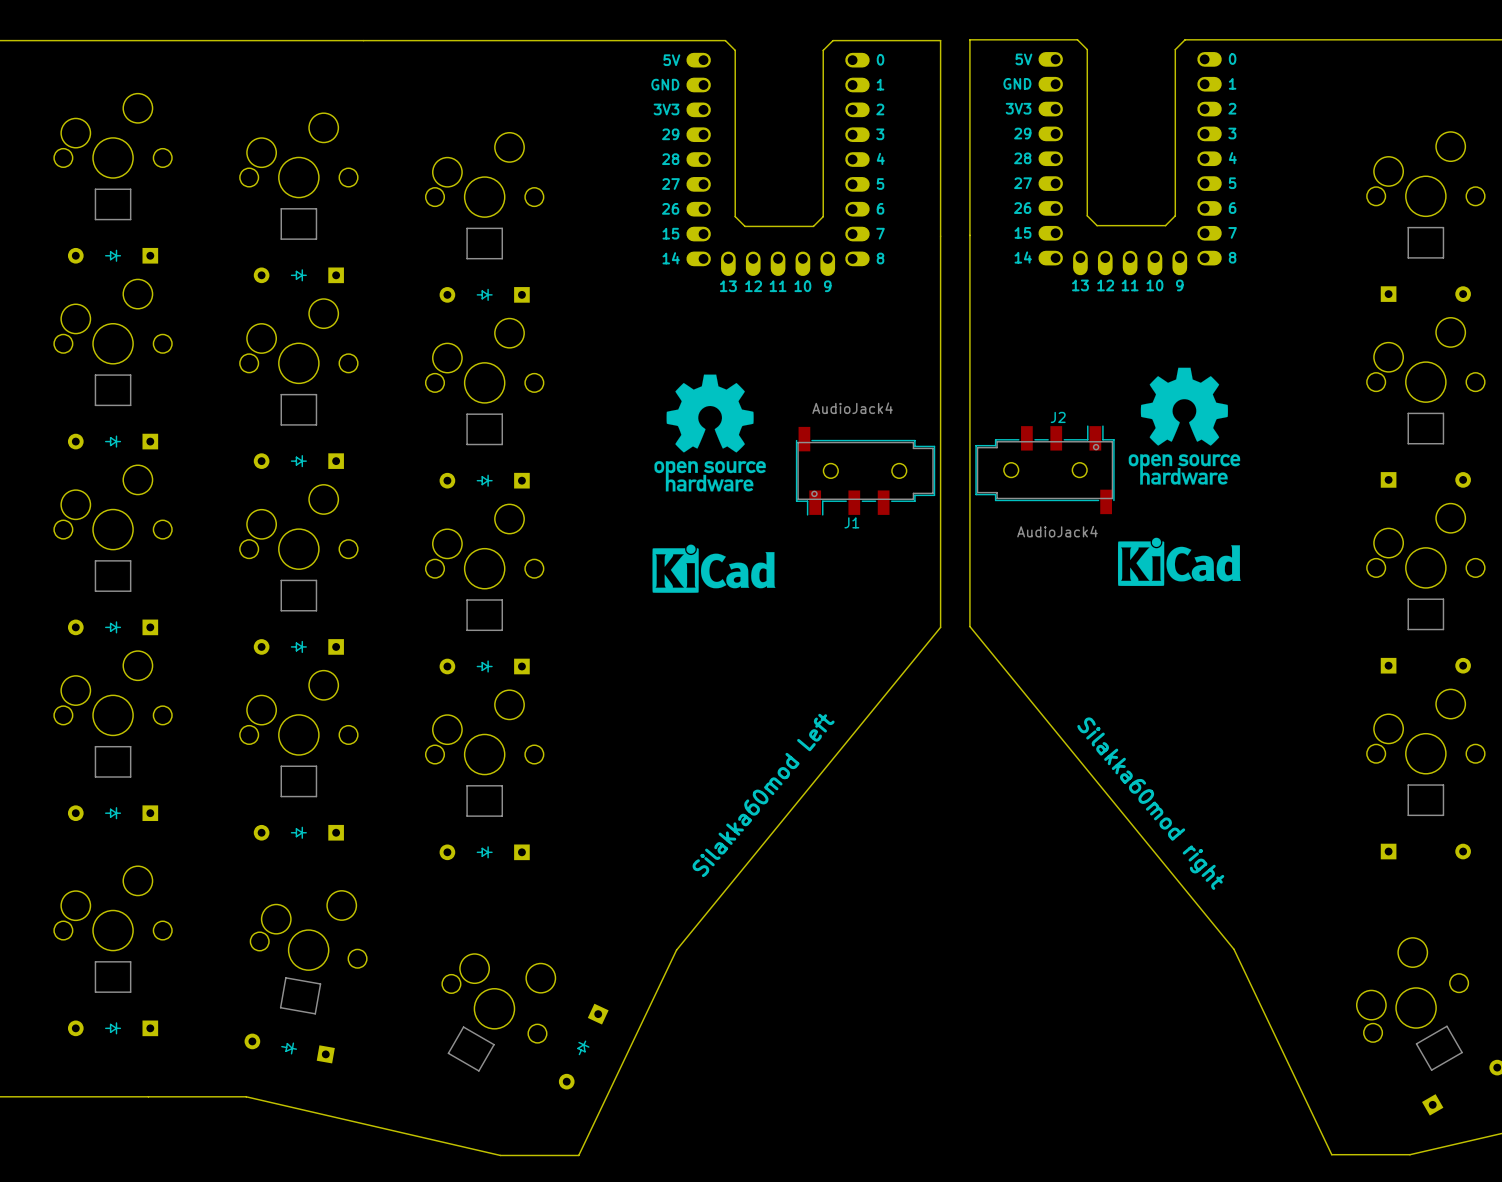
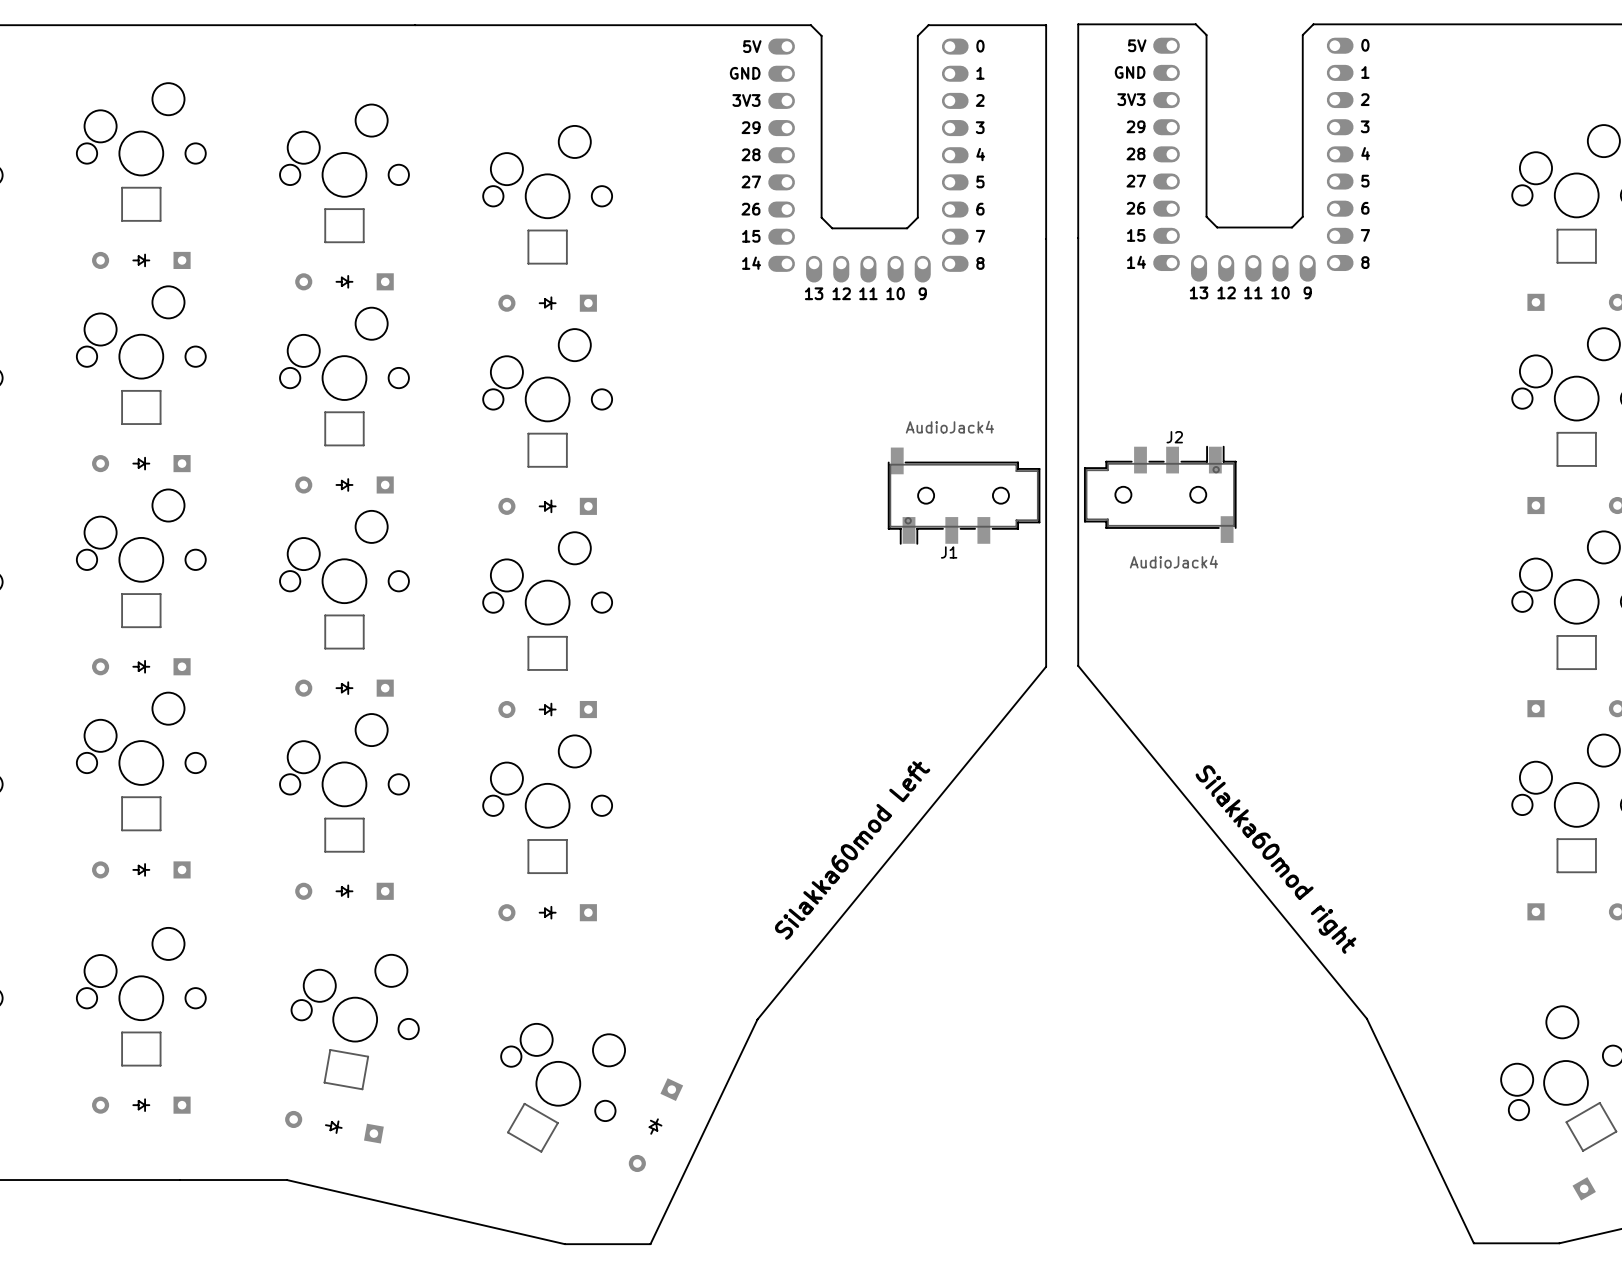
drawing: [1128, 367, 1241, 485] -> none
drawing: [654, 374, 766, 492] -> none
drawing: [1117, 537, 1241, 586] -> none
drawing: [652, 544, 776, 593] -> none

